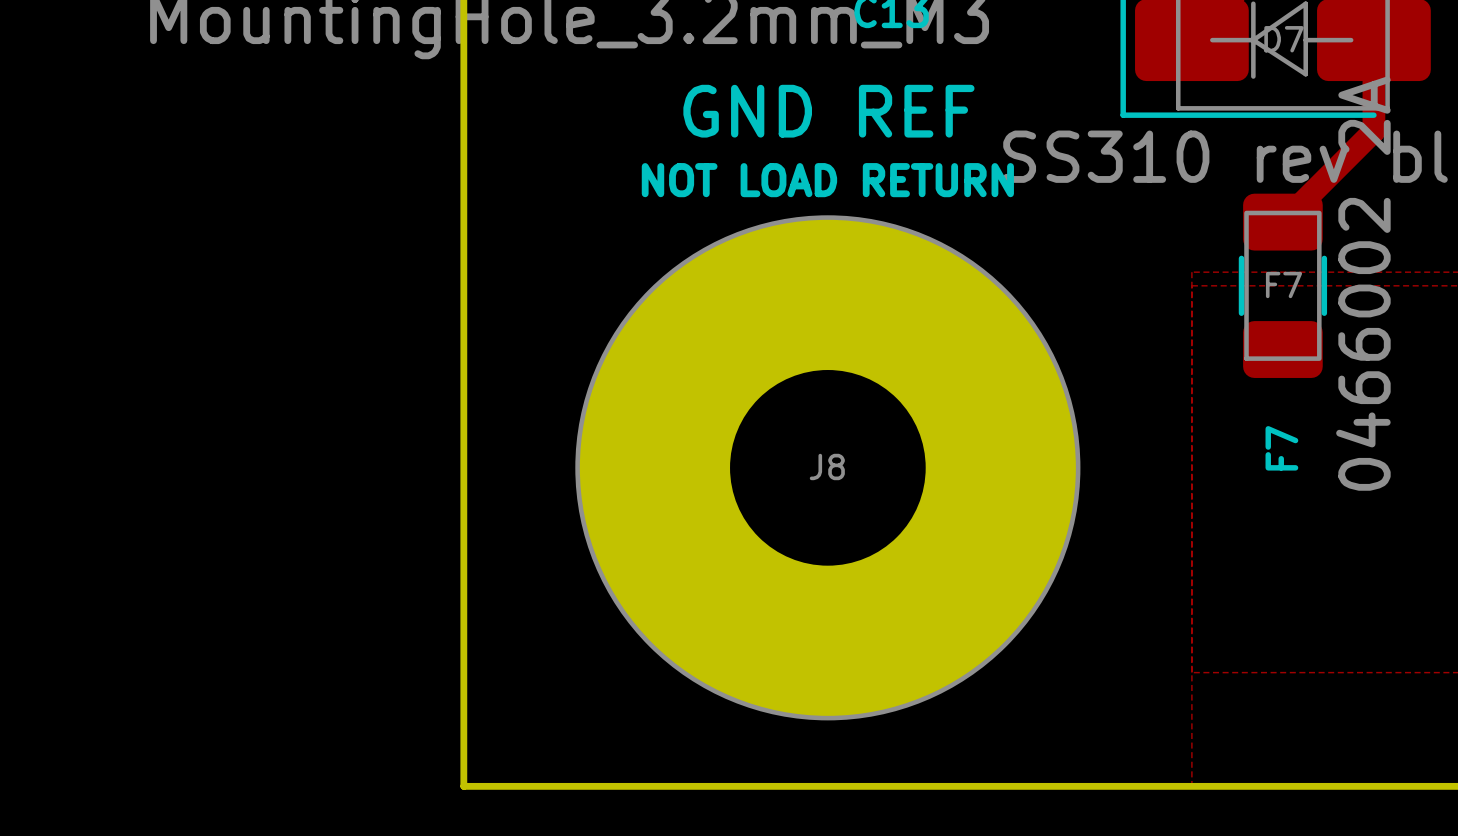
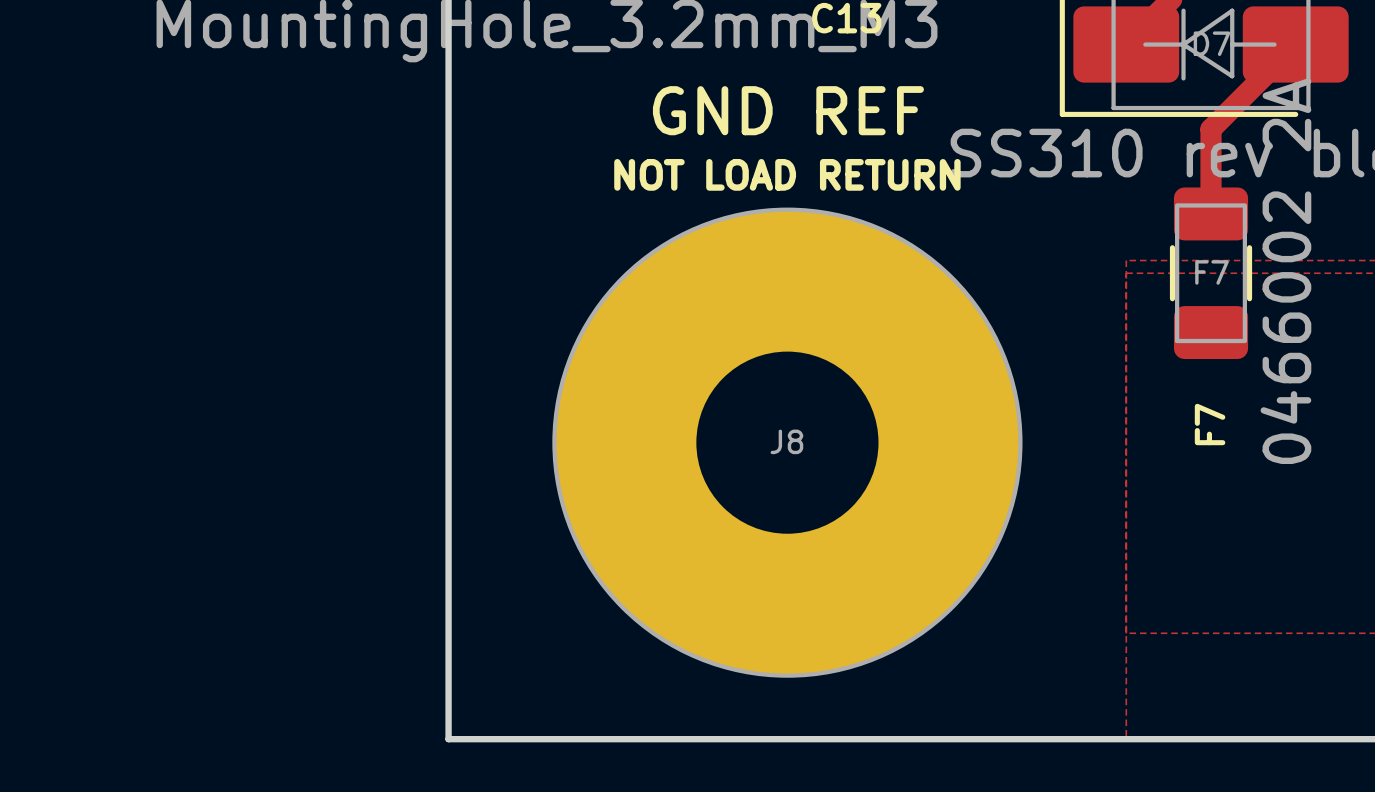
track: (1373, 40) (1373, 131) (1282, 222) -> (1295, 44) (1211, 129) (1211, 213)

